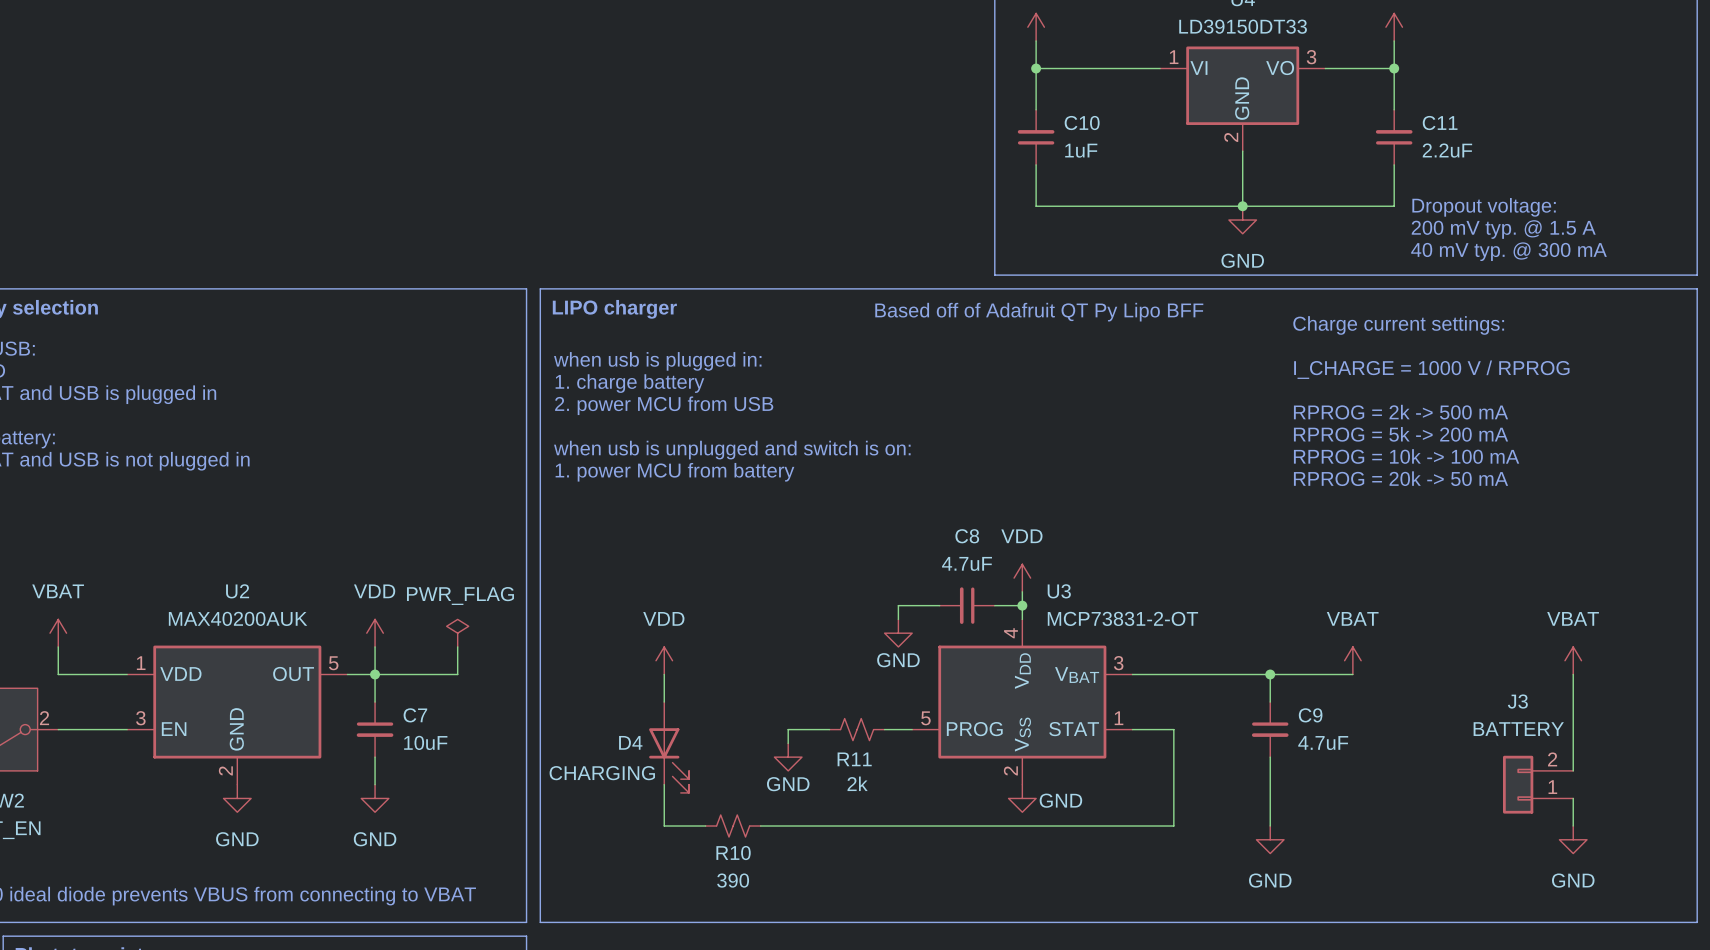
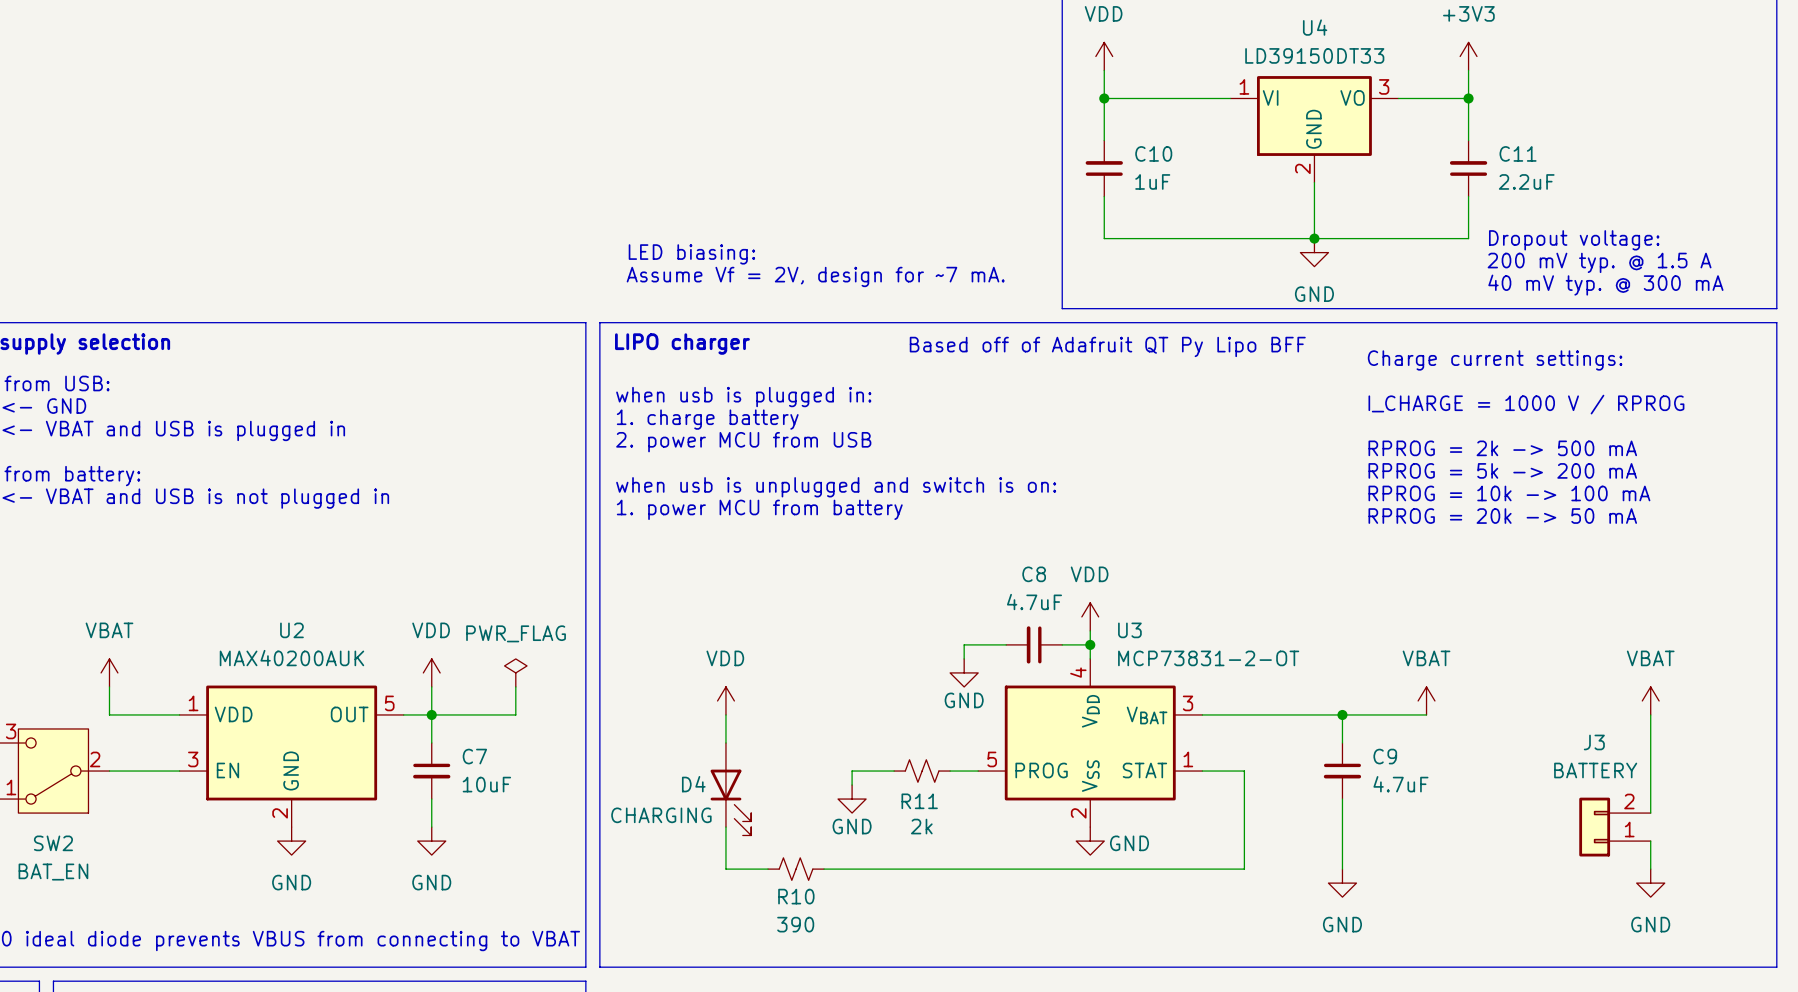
text: none -> LED biasing: (691, 254)
text: none -> Assume Vf = 2V, design for ~7 mA. (815, 276)

